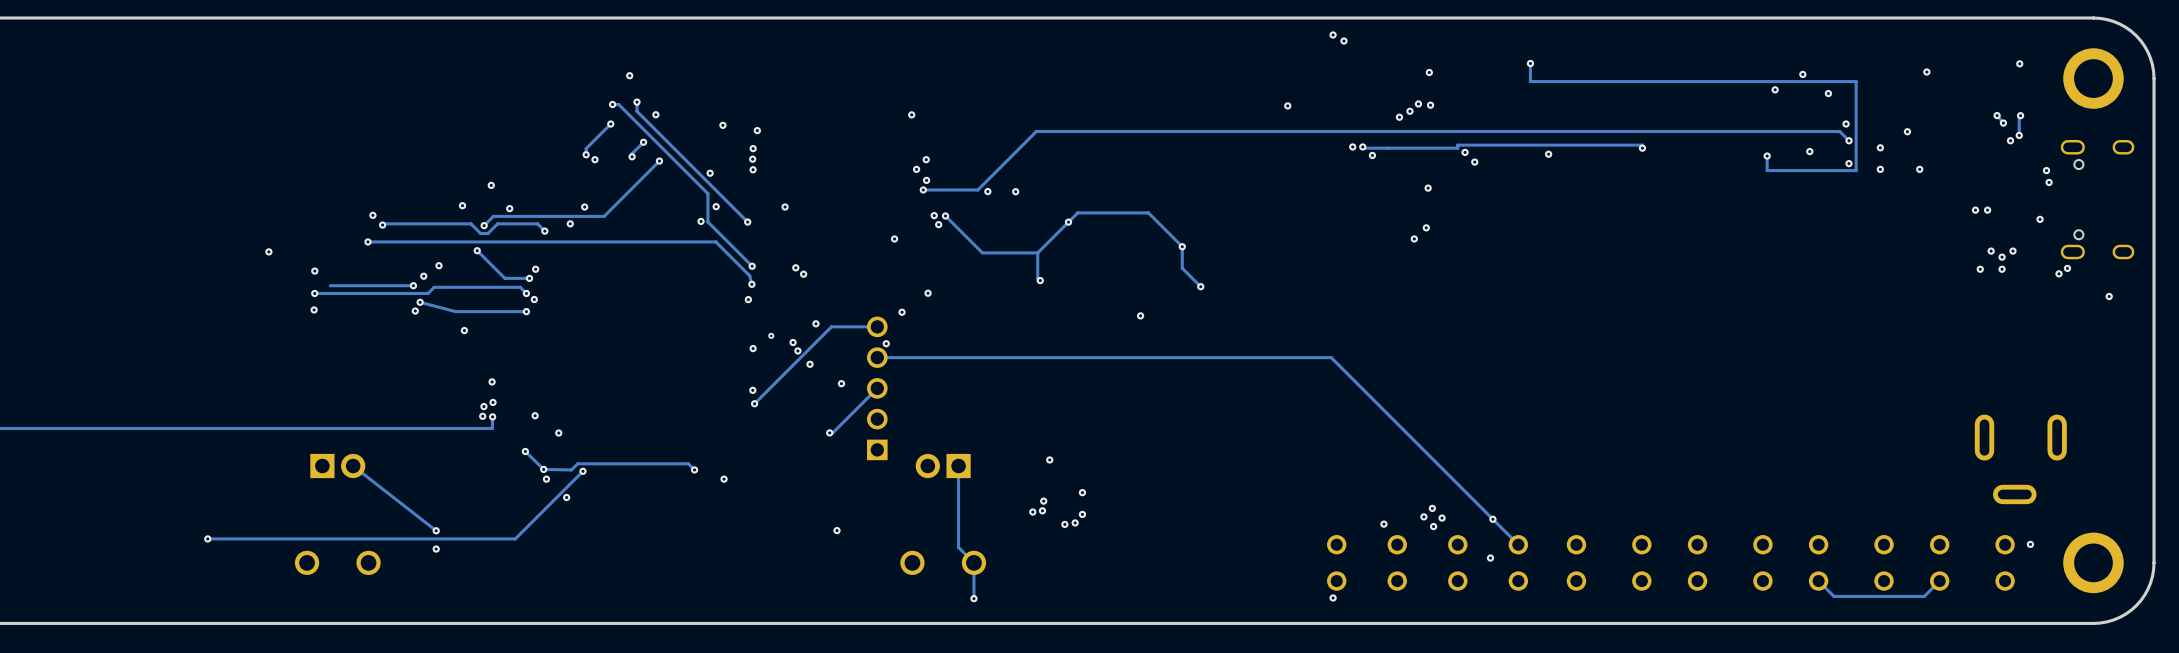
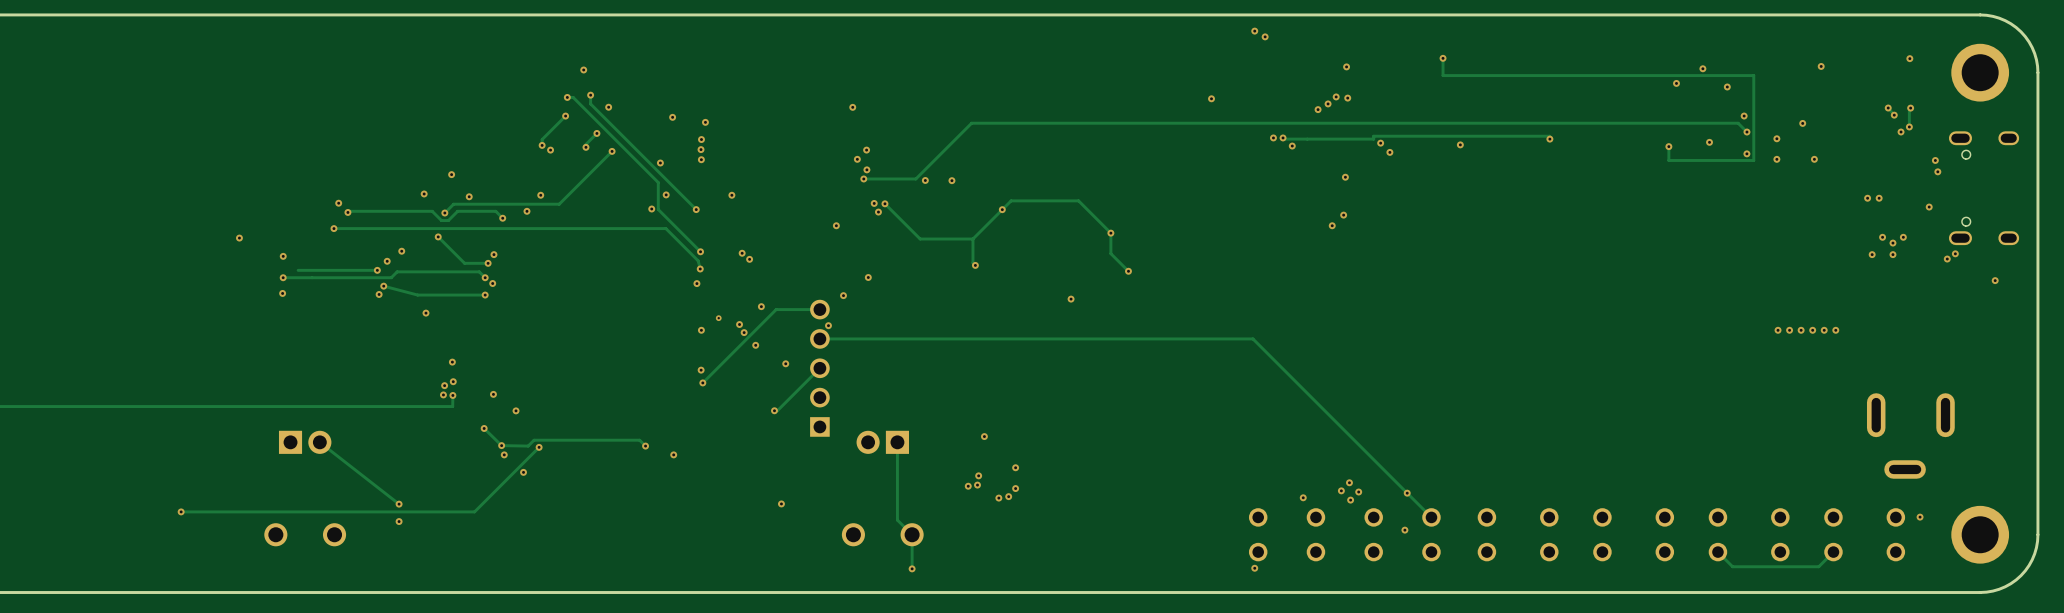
via: none -> (1778, 330)
via: none -> (1789, 330)
via: none -> (1801, 330)
via: none -> (1812, 330)
via: none -> (1824, 330)
via: none -> (1835, 330)

